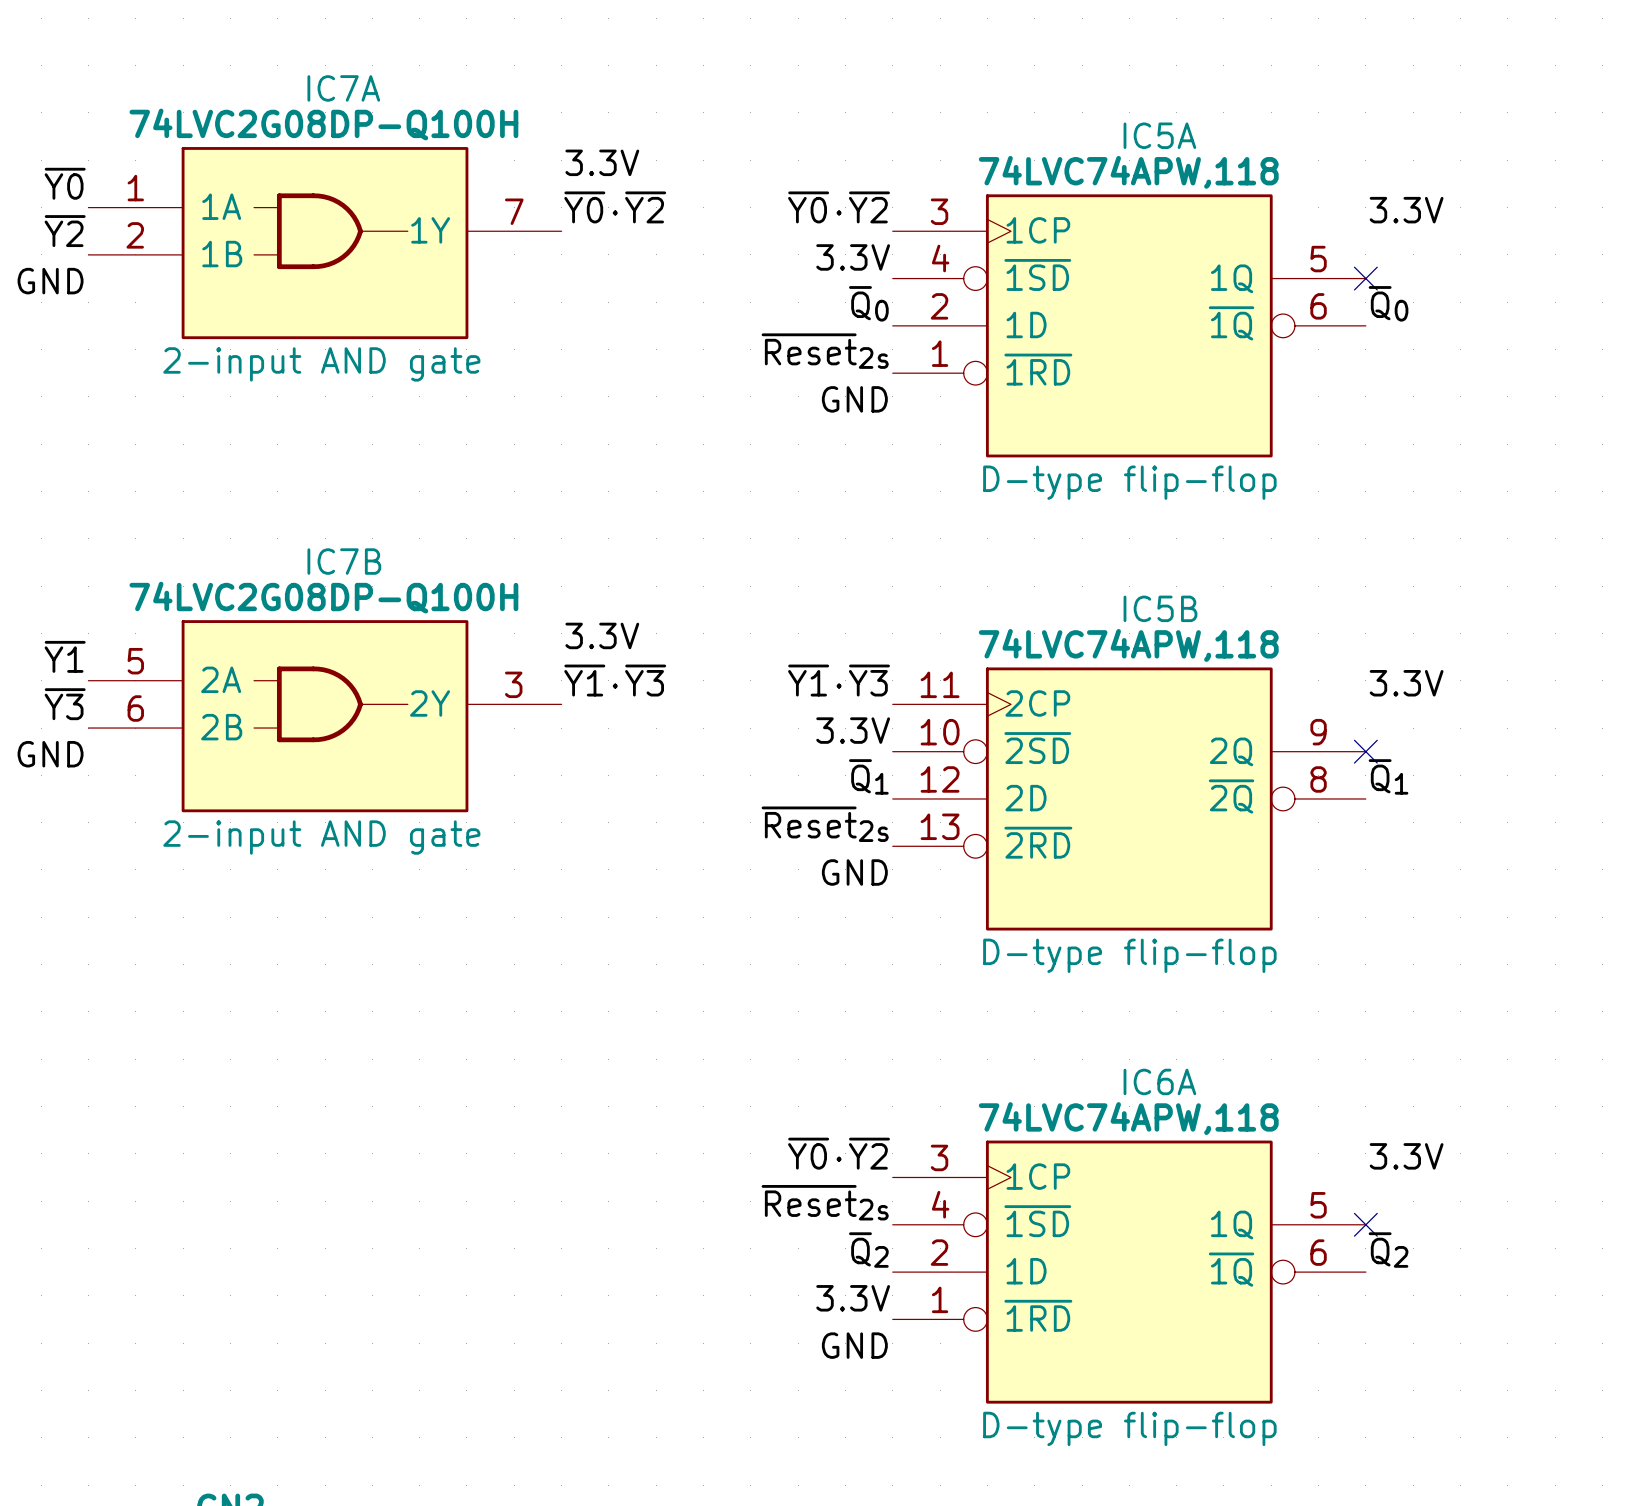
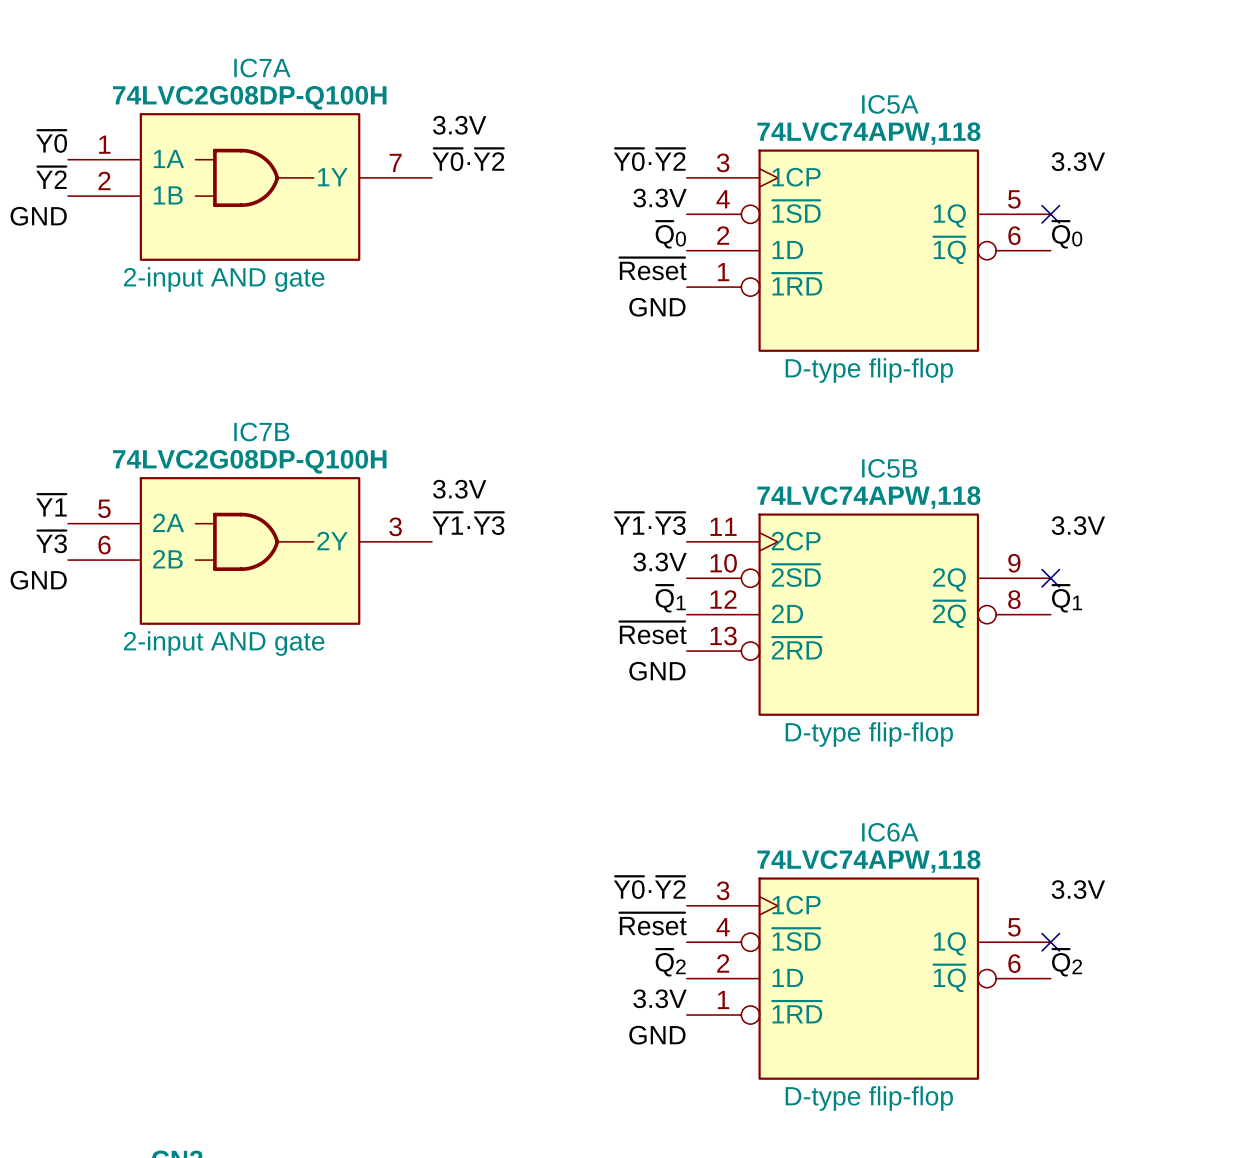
label: ~{Reset}2s (825, 351) -> ~{Reset} (653, 268)
label: ~{Reset}2s (825, 824) -> ~{Reset} (653, 632)
label: ~{Reset}2s (825, 1202) -> ~{Reset} (653, 924)

